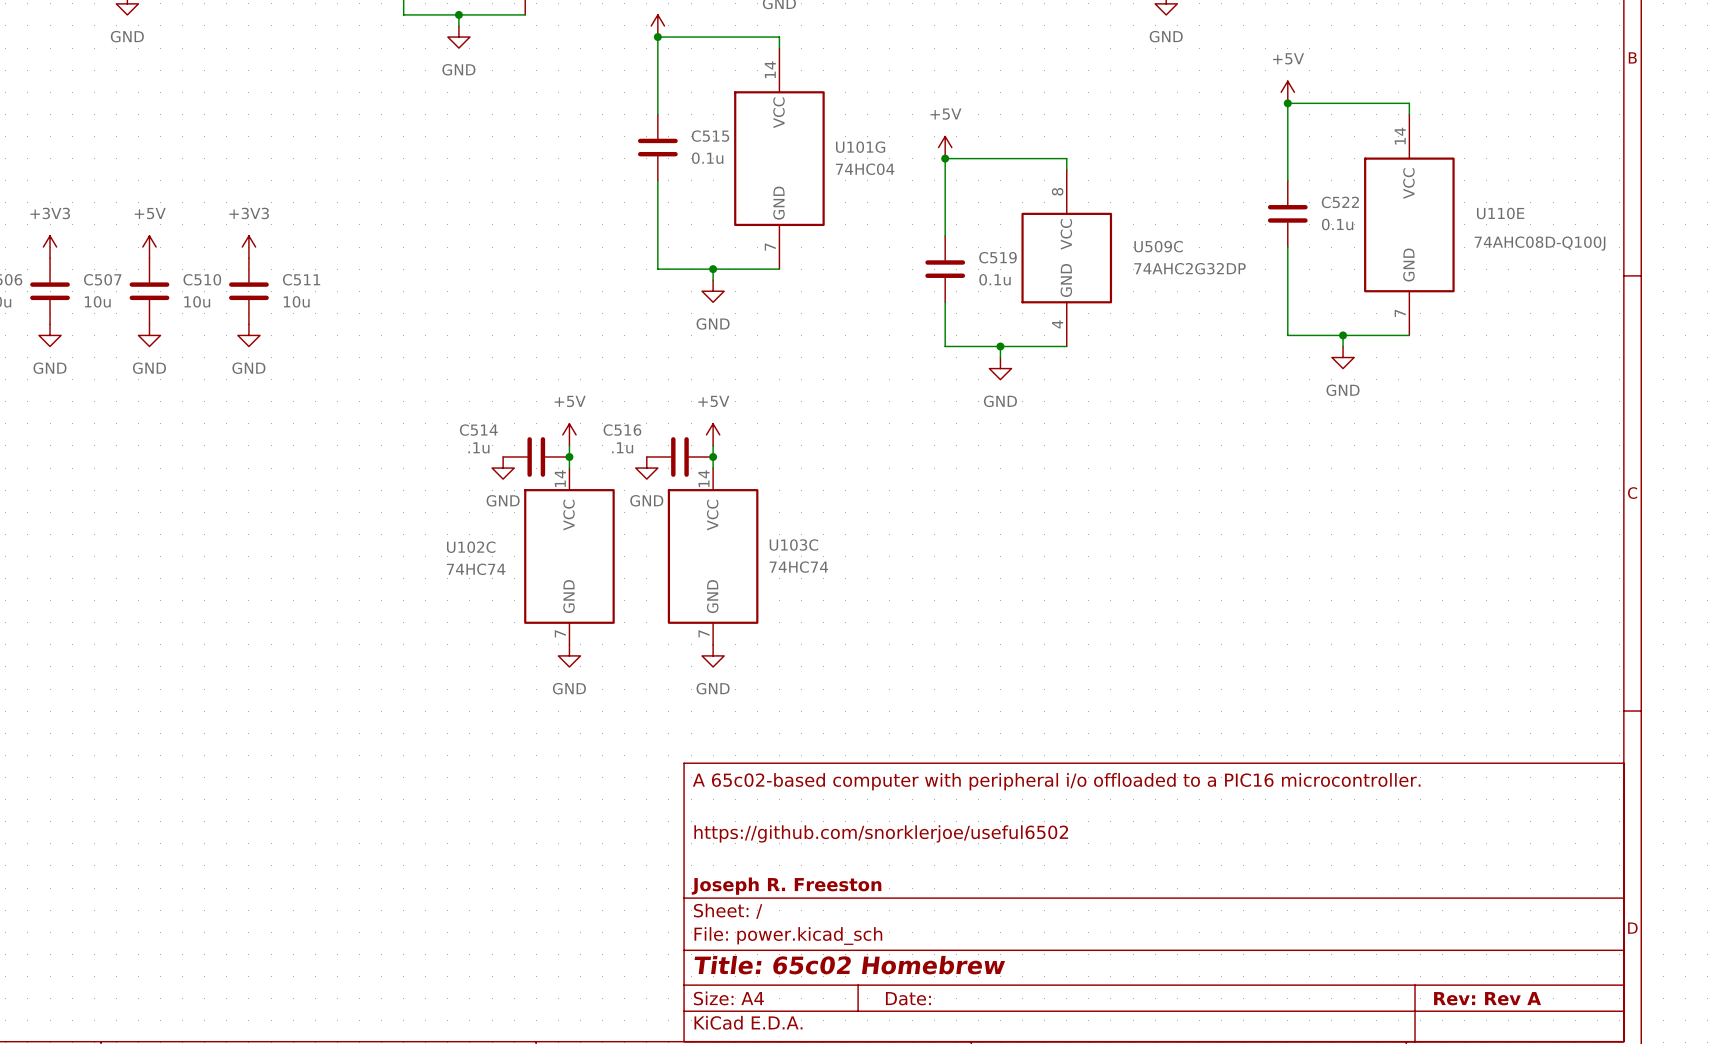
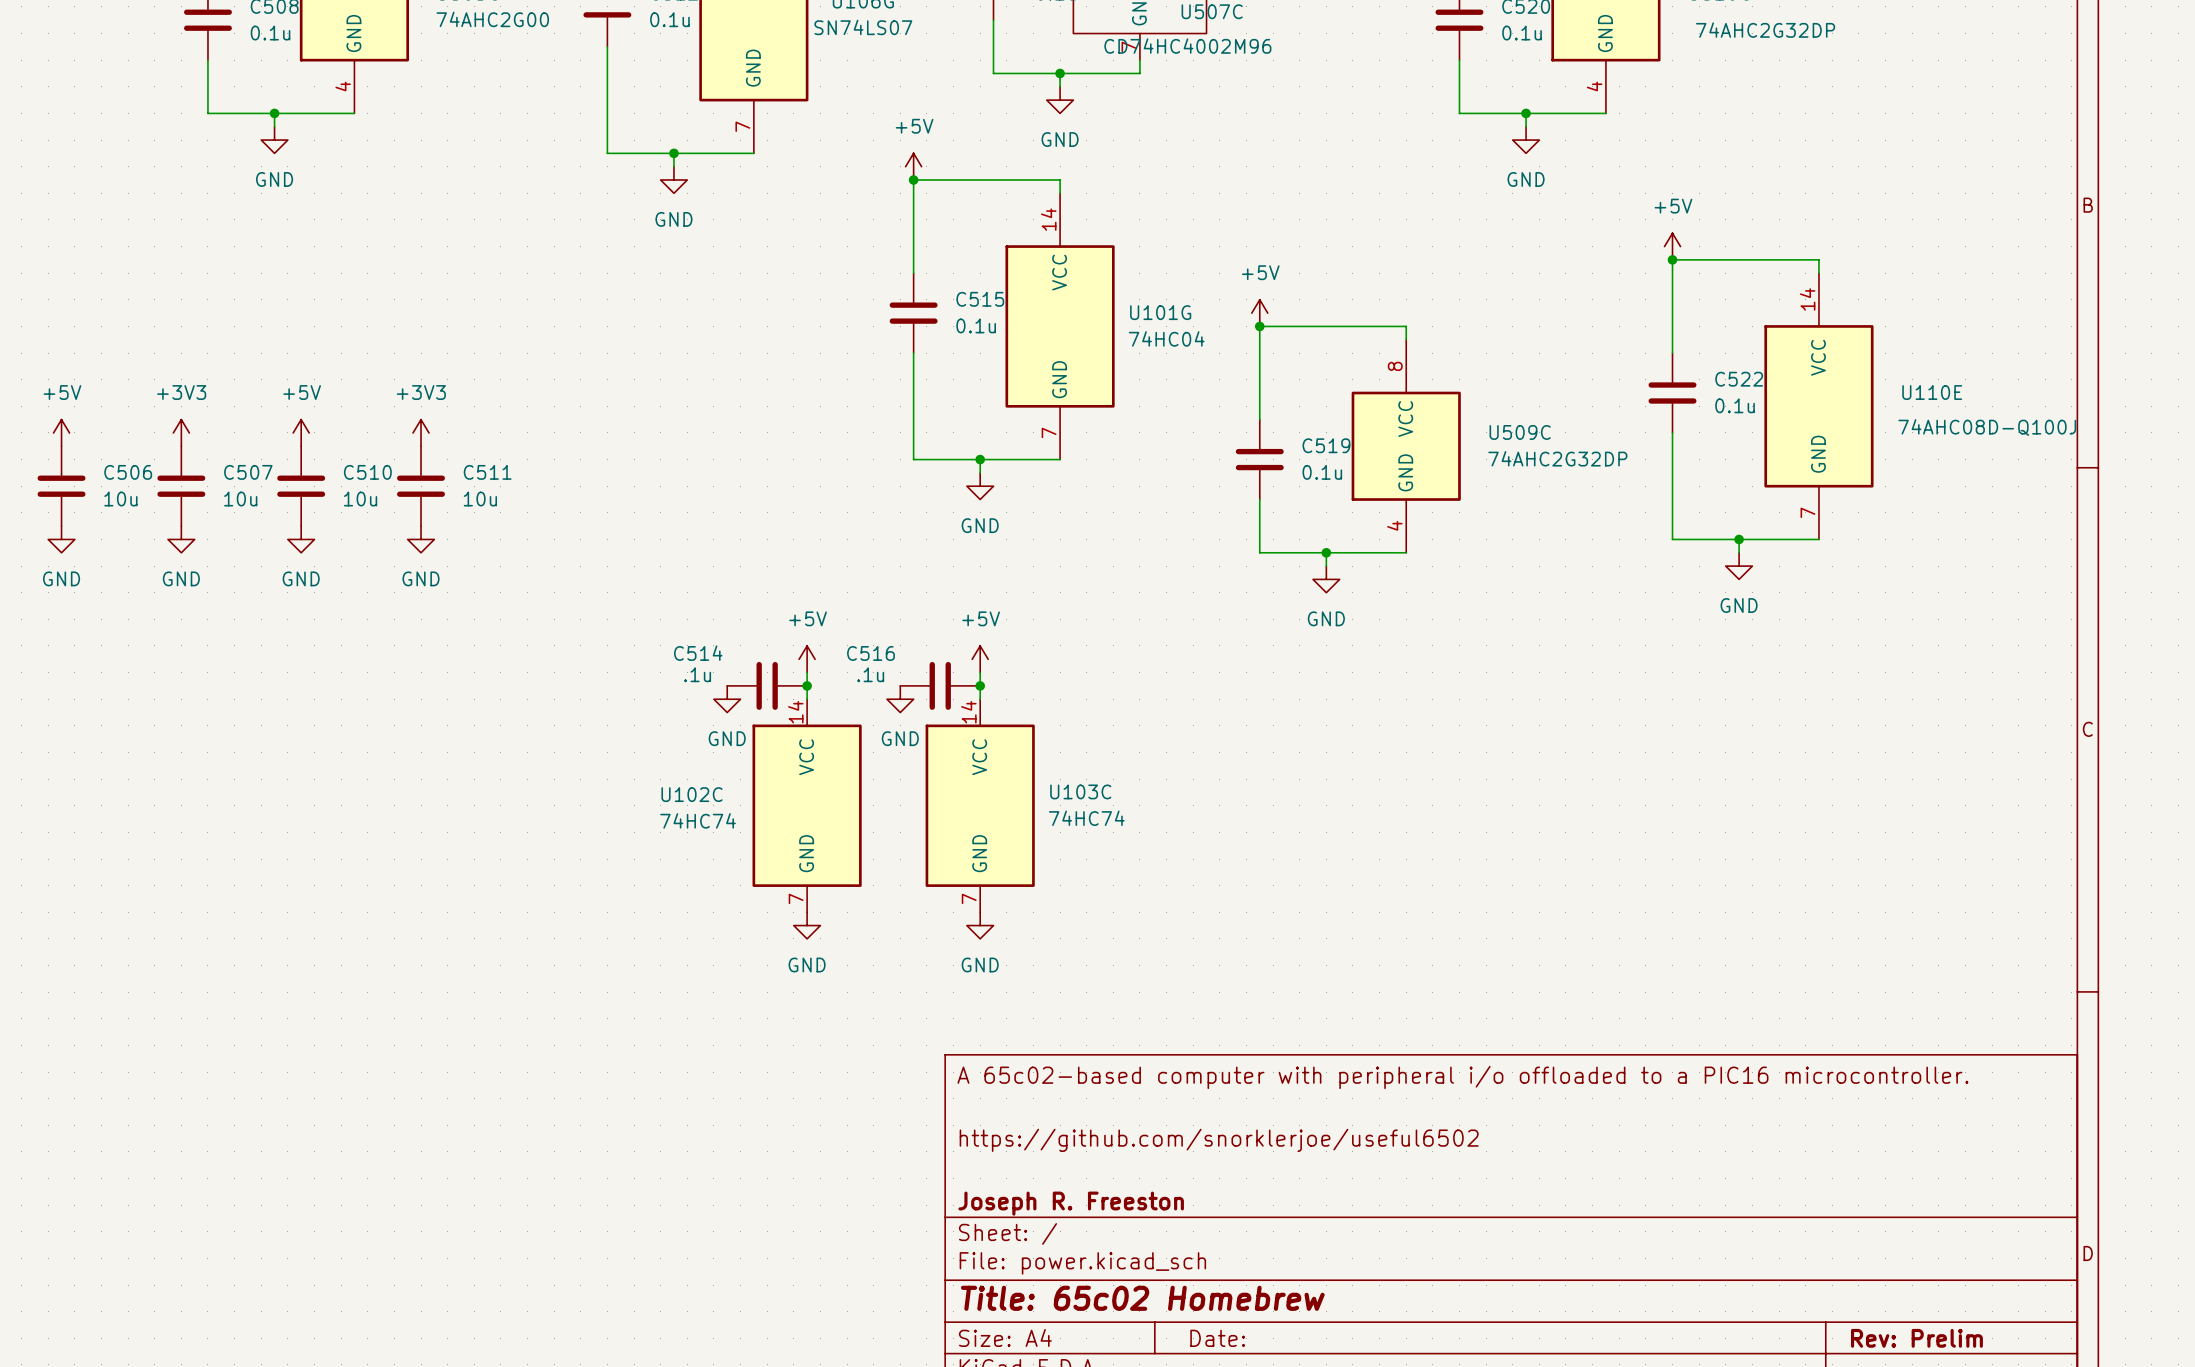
title block: Rev: Rev A (1487, 998) -> Rev: Prelim (1916, 1338)

